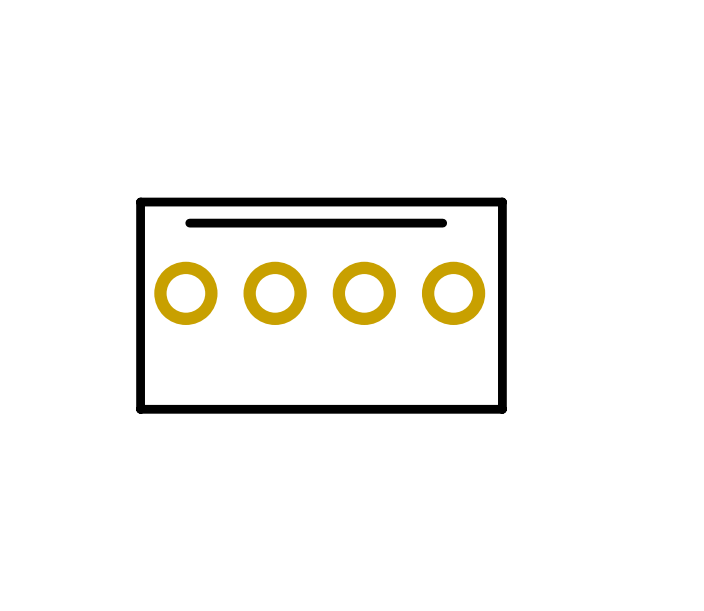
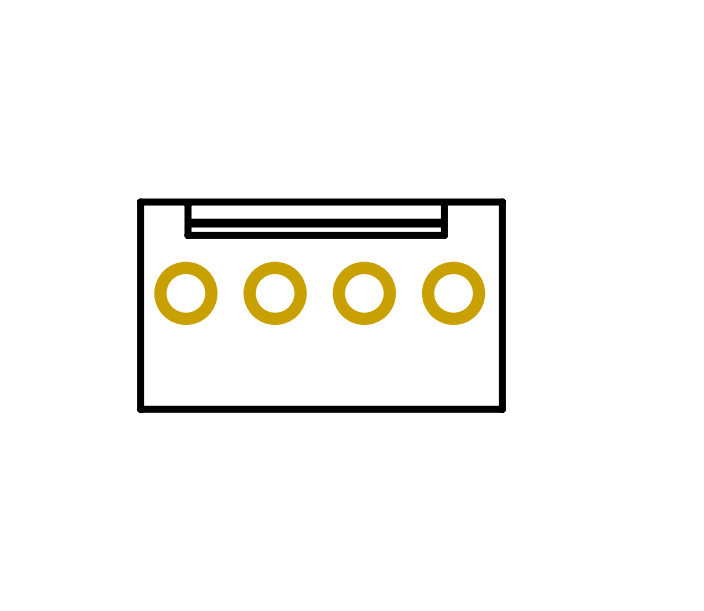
part footprint: [136, 197, 507, 414] -> [137, 198, 506, 413]

